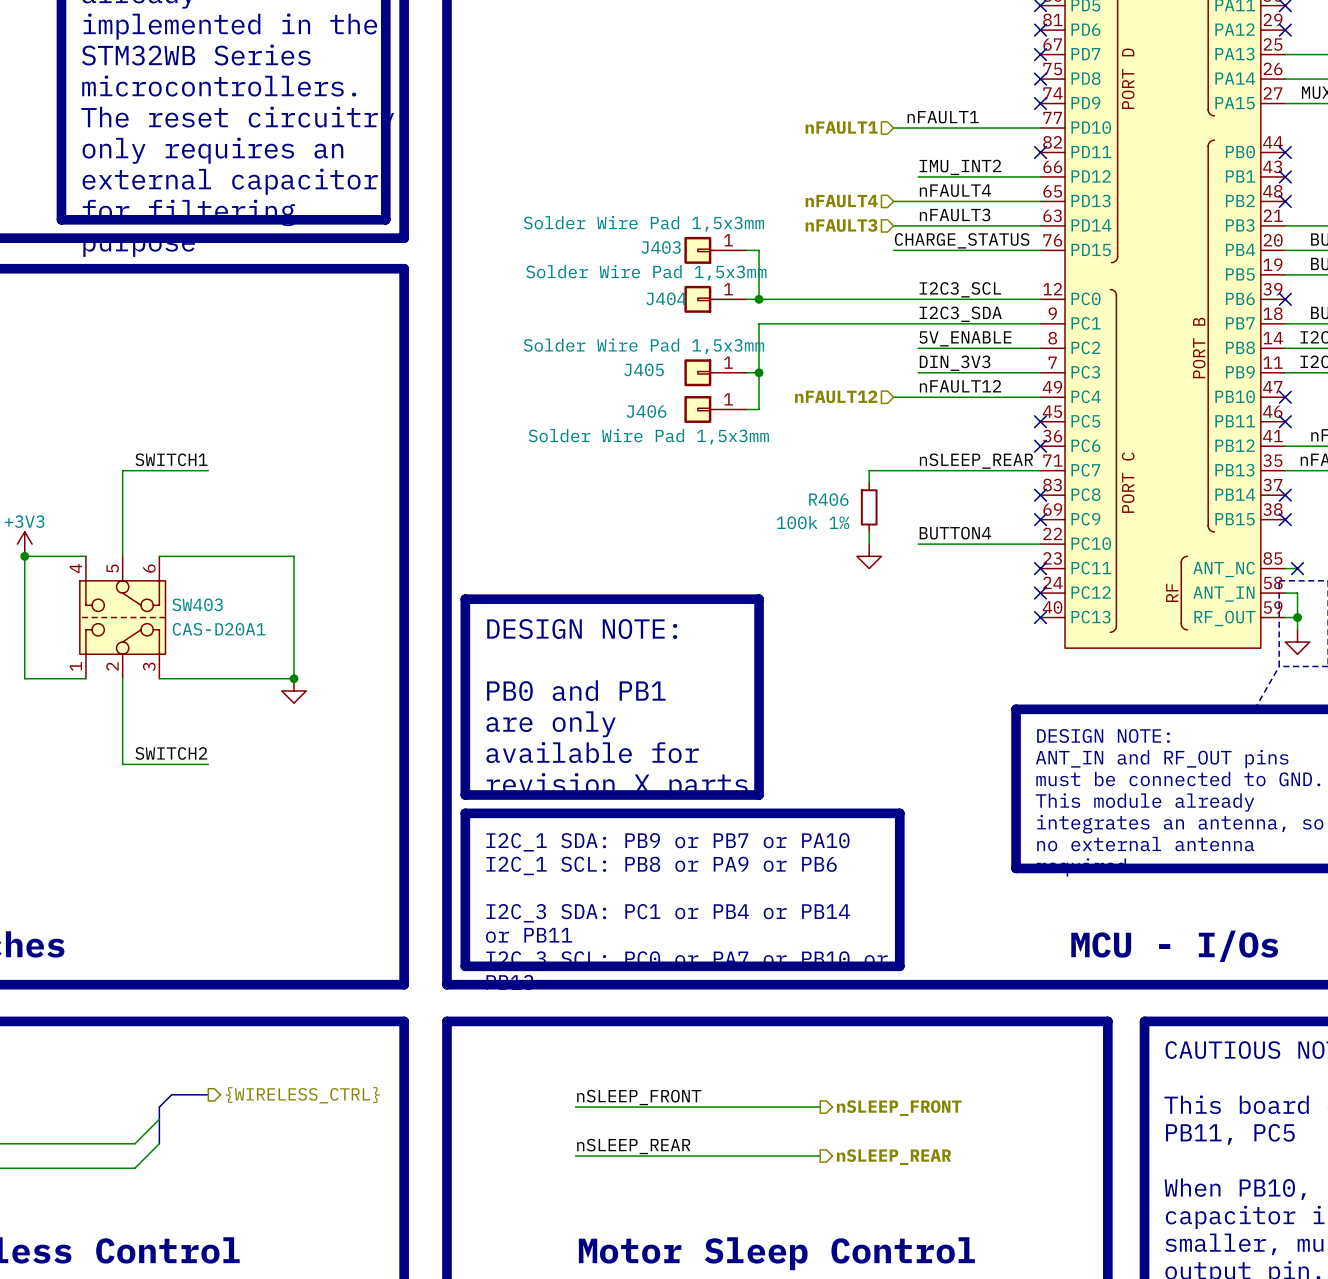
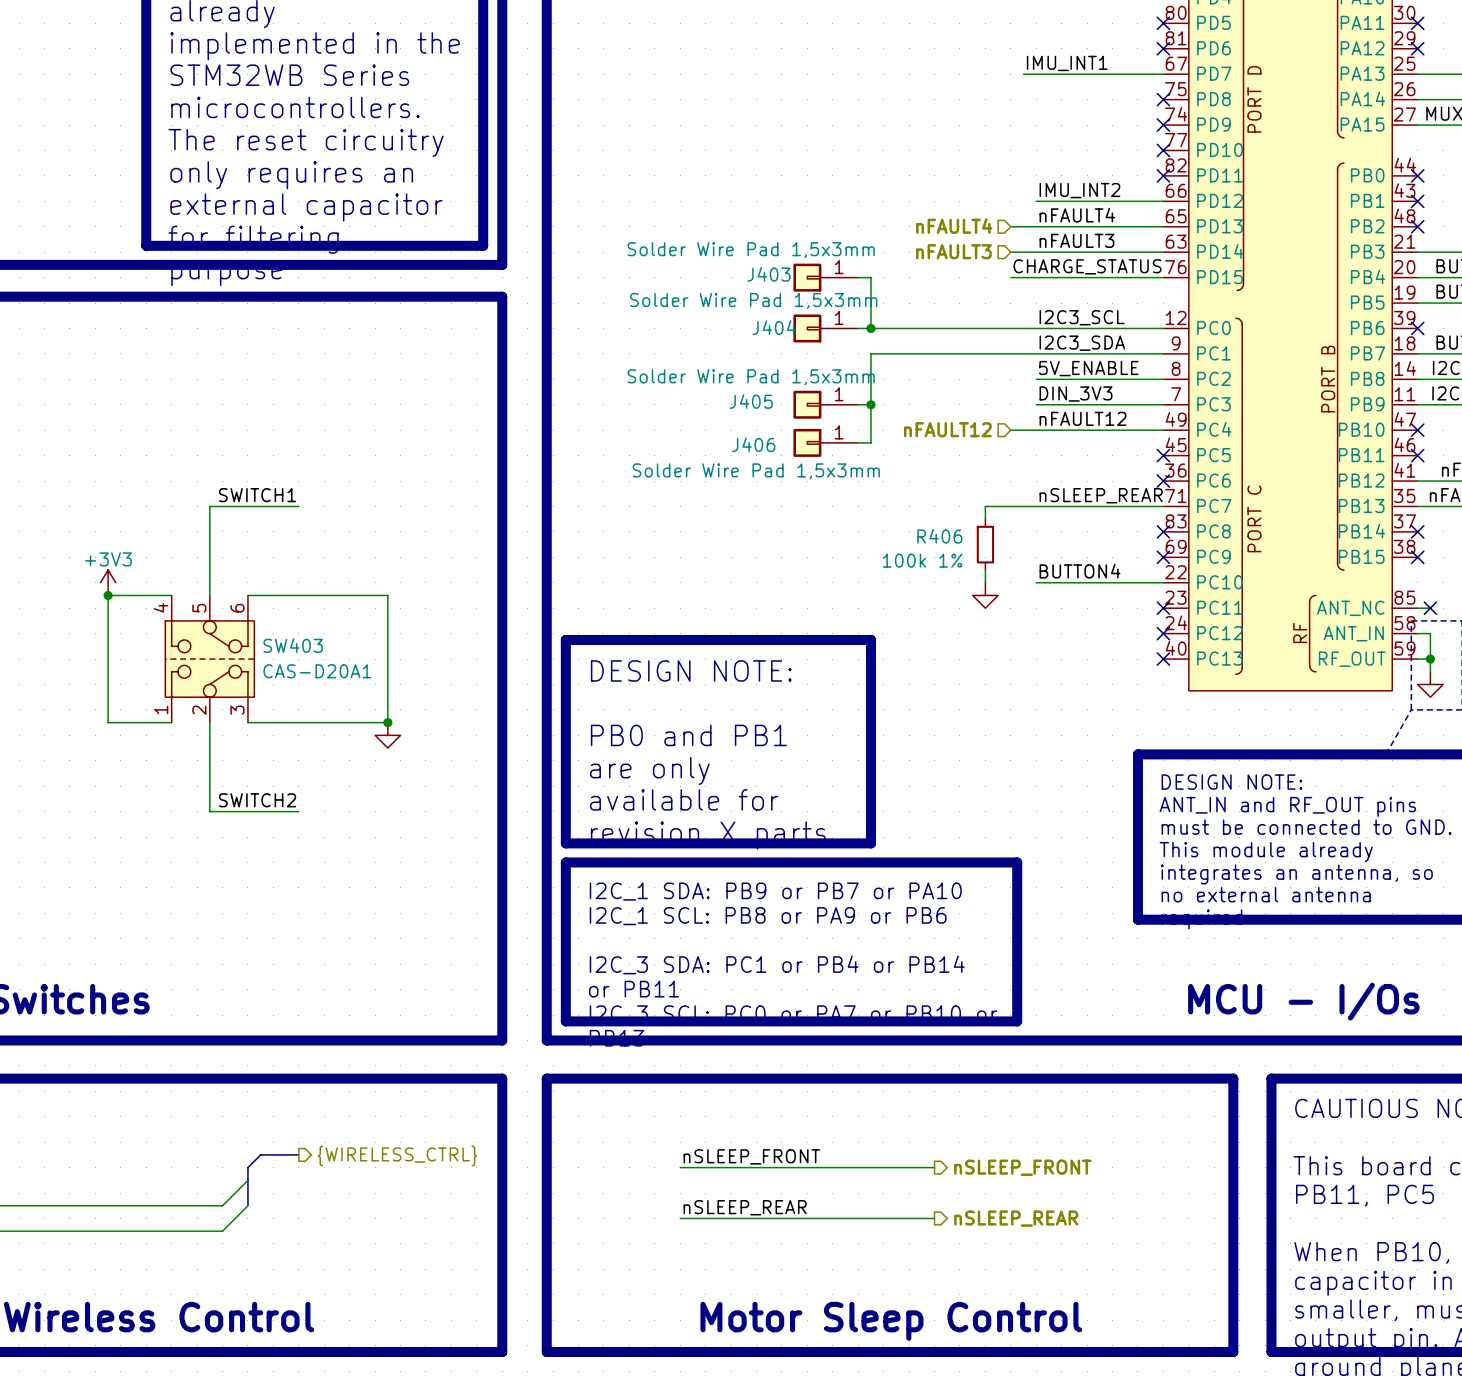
label: none -> IMU_INT1 (1067, 63)
wire: none -> (1023, 74) (1163, 74)
no-connect mark: (1040, 54) -> none
label: nFAULT1 (943, 117) -> none
hierarchical label: nFAULT1 (841, 127) -> none
wire: (893, 128) (1040, 128) -> none
no-connect mark: none -> (1163, 150)

